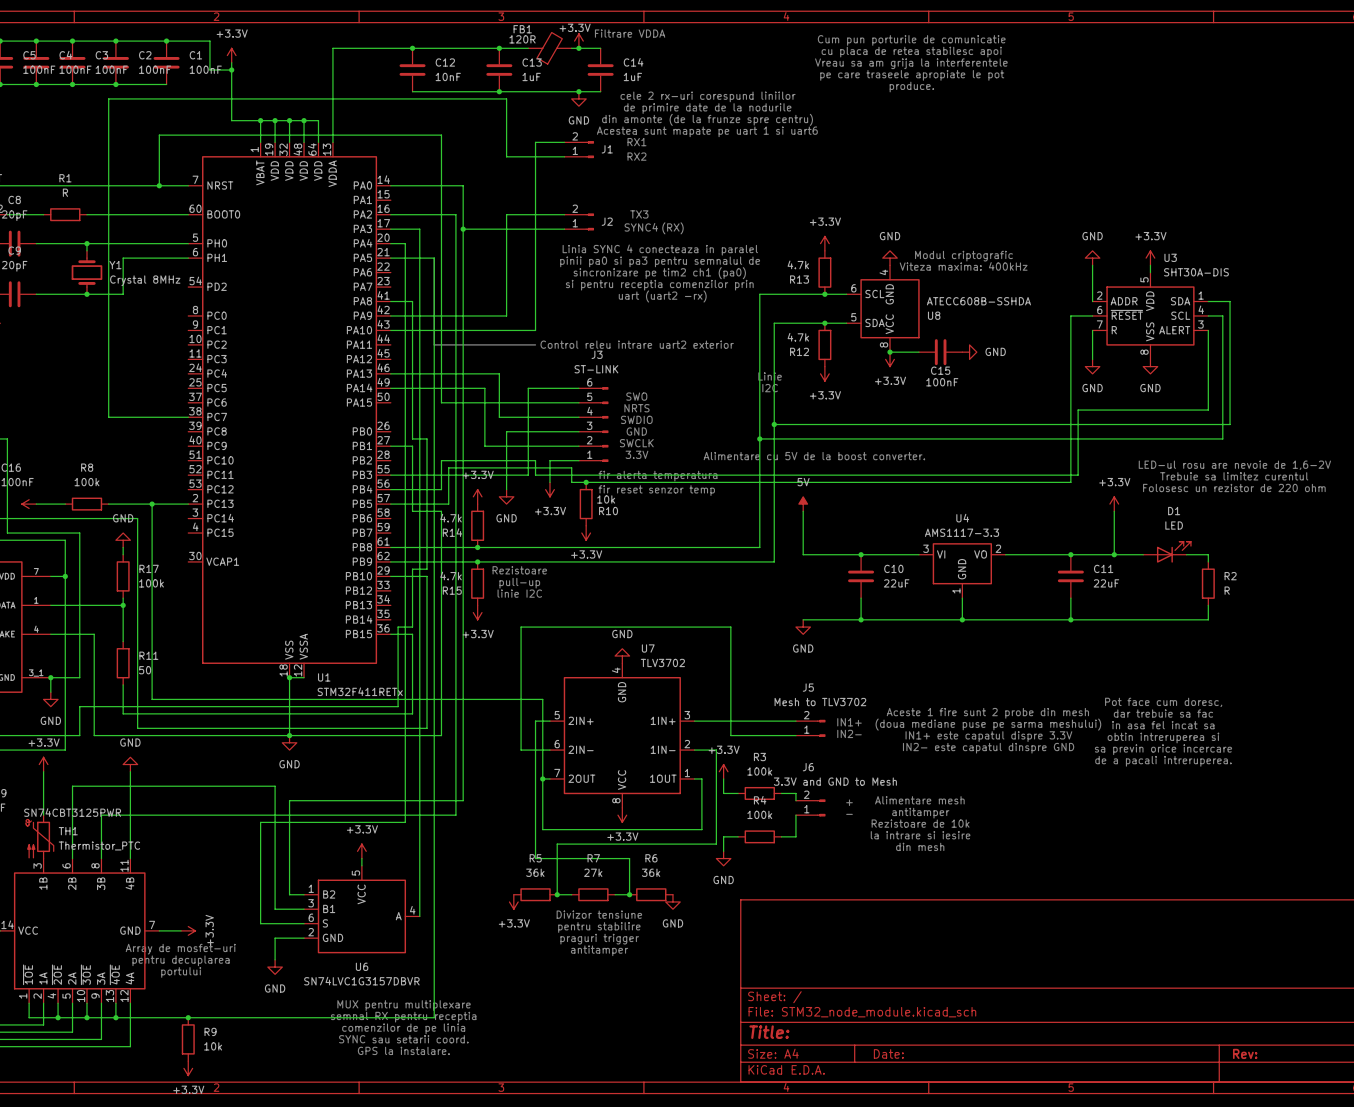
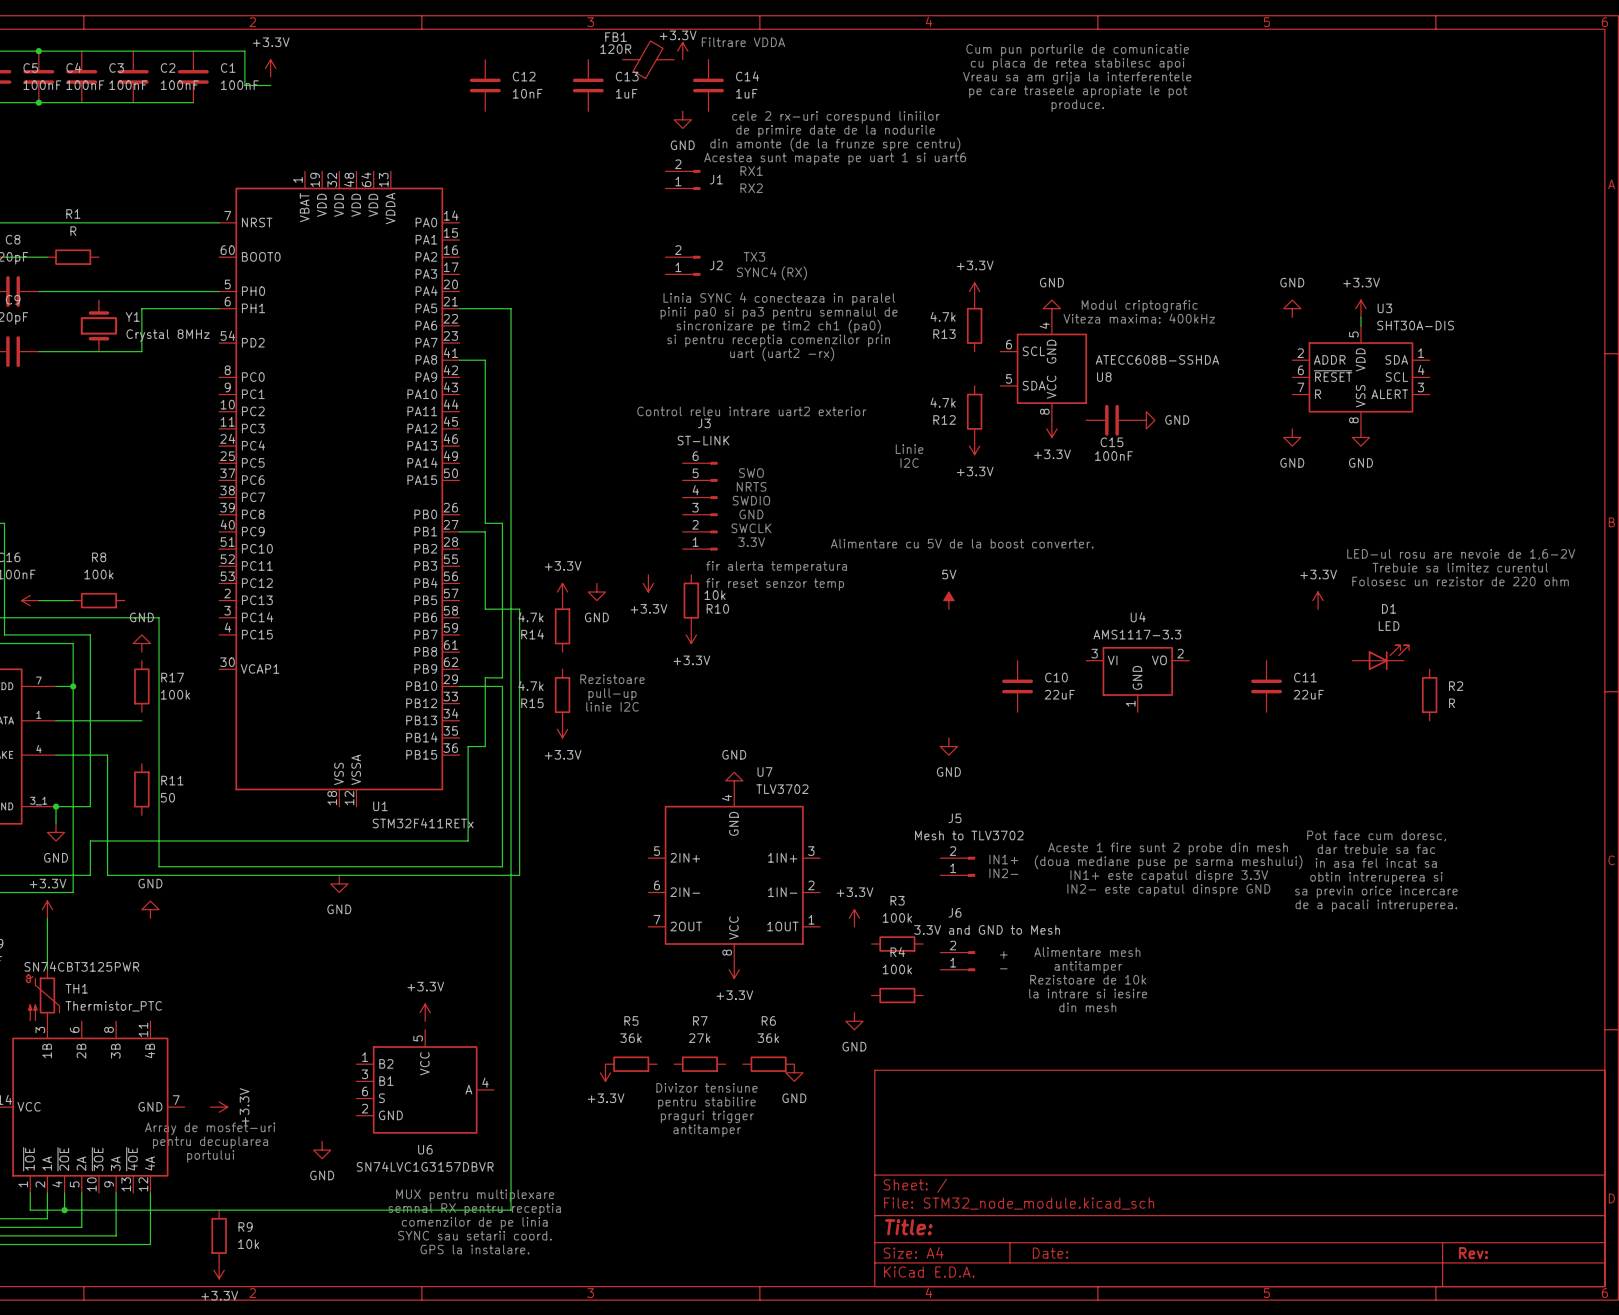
junction: (72, 41) -> none
junction: (115, 41) -> none
junction: (166, 41) -> none
junction: (412, 48) -> none
junction: (499, 48) -> none
wire: (528, 48) (332, 48) (332, 142) -> none
wire: (571, 48) (600, 48) -> none
junction: (578, 48) -> none
wire: (231, 62) (231, 120) (318, 120) (318, 142) -> none
junction: (231, 70) -> none
junction: (72, 84) -> none
junction: (115, 84) -> none
wire: (412, 91) (600, 91) -> none
junction: (499, 91) -> none
junction: (578, 91) -> none
wire: (260, 120) (260, 142) -> none
junction: (260, 120) -> none
wire: (275, 120) (275, 142) -> none
junction: (275, 120) -> none
wire: (289, 120) (289, 142) -> none
junction: (289, 120) -> none
wire: (304, 120) (304, 142) -> none
junction: (304, 120) -> none
wire: (564, 142) (535, 142) (535, 330) (390, 330) -> none
wire: (564, 156) (506, 156) (506, 98) (108, 98) (108, 417) (188, 417) -> none
wire: (159, 185) (159, 135) (441, 135) (441, 402) (578, 402) -> none
junction: (159, 185) -> none
wire: (390, 185) (463, 185) (463, 800) (289, 800) (289, 894) (304, 894) -> none
wire: (86, 214) (188, 214) -> none
wire: (390, 214) (455, 214) (455, 815) (101, 815) (101, 858) -> none
wire: (564, 214) (506, 214) (506, 315) (390, 315) -> none
wire: (390, 229) (419, 229) (419, 916) -> none
wire: (463, 229) (564, 229) -> none
junction: (463, 229) -> none
wire: (86, 243) (86, 250) -> none
junction: (86, 243) -> none
wire: (390, 243) (405, 243) (405, 822) (260, 822) (260, 923) (304, 923) -> none
line: (434, 258) (434, 344) (535, 344) -> none
wire: (1092, 265) (1092, 301) -> none
junction: (86, 294) -> none
junction: (824, 294) -> none
wire: (846, 294) (759, 294) (759, 547) (390, 547) -> none
wire: (1208, 301) (1230, 301) (1230, 424) (774, 424) -> none
wire: (1092, 315) (1070, 315) (1070, 482) (571, 482) (571, 467) (448, 467) (448, 504) (390, 504) -> none
wire: (1208, 315) (1222, 315) (1222, 438) (759, 438) -> none
junction: (824, 323) -> none
wire: (846, 323) (774, 323) (774, 561) (390, 561) -> none
wire: (1092, 330) (1092, 359) -> none
wire: (1208, 330) (1208, 410) (1078, 410) (1078, 475) (535, 475) (535, 460) (441, 460) (441, 489) (390, 489) -> none
wire: (890, 352) (918, 352) -> none
junction: (890, 352) -> none
wire: (390, 373) (499, 373) (499, 417) (578, 417) -> none
wire: (390, 388) (484, 388) (484, 446) (578, 446) -> none
wire: (578, 388) (528, 388) (528, 475) (390, 475) -> none
junction: (774, 424) -> none
wire: (578, 431) (506, 431) (506, 489) -> none
junction: (759, 438) -> none
wire: (578, 460) (549, 460) (549, 482) -> none
junction: (586, 482) -> none
wire: (108, 504) (188, 504) -> none
wire: (152, 504) (152, 699) (542, 699) (542, 829) (701, 829) (701, 778) (694, 778) -> none
junction: (152, 504) -> none
wire: (803, 511) (803, 554) (918, 554) -> none
wire: (1114, 511) (1114, 554) -> none
wire: (123, 547) (123, 554) -> none
junction: (477, 547) -> none
junction: (861, 554) -> none
wire: (1005, 554) (1143, 554) -> none
junction: (1070, 554) -> none
junction: (1114, 554) -> none
wire: (1186, 554) (1208, 554) (1208, 561) -> none
junction: (477, 561) -> none
wire: (123, 598) (123, 641) -> none
wire: (861, 598) (861, 619) -> none
wire: (962, 598) (962, 619) -> none
wire: (1070, 598) (1070, 619) -> none
junction: (123, 605) -> none
wire: (1208, 605) (1208, 619) (803, 619) -> none
junction: (861, 619) -> none
junction: (962, 619) -> none
junction: (1070, 619) -> none
wire: (390, 634) (412, 634) (412, 713) (123, 713) (123, 684) -> none
junction: (289, 677) -> none
wire: (304, 677) (289, 677) (289, 735) -> none
wire: (549, 721) (535, 721) (535, 858) (629, 858) (629, 894) (615, 894) -> none
wire: (694, 721) (795, 721) -> none
junction: (289, 735) -> none
wire: (795, 735) (730, 735) (730, 627) (521, 627) (521, 750) (549, 750) -> none
wire: (694, 750) (716, 750) (716, 844) (557, 844) (557, 894) (571, 894) -> none
wire: (130, 771) (130, 858) -> none
wire: (542, 778) (549, 778) -> none
junction: (542, 778) -> none
wire: (723, 778) (723, 793) (738, 793) -> none
wire: (781, 793) (795, 793) (795, 800) -> none
wire: (795, 815) (795, 836) (781, 836) -> none
wire: (738, 836) (723, 836) (723, 851) -> none
wire: (72, 858) (72, 786) (275, 786) (275, 909) (304, 909) -> none
wire: (361, 858) (361, 865) -> none
junction: (557, 894) -> none
junction: (629, 894) -> none
wire: (159, 930) (181, 930) -> none
wire: (304, 938) (275, 938) (275, 959) -> none
wire: (86, 1003) (86, 1017) -> none
wire: (115, 1003) (115, 1017) -> none
junction: (86, 1017) -> none
junction: (115, 1017) -> none
junction: (188, 1017) -> none

